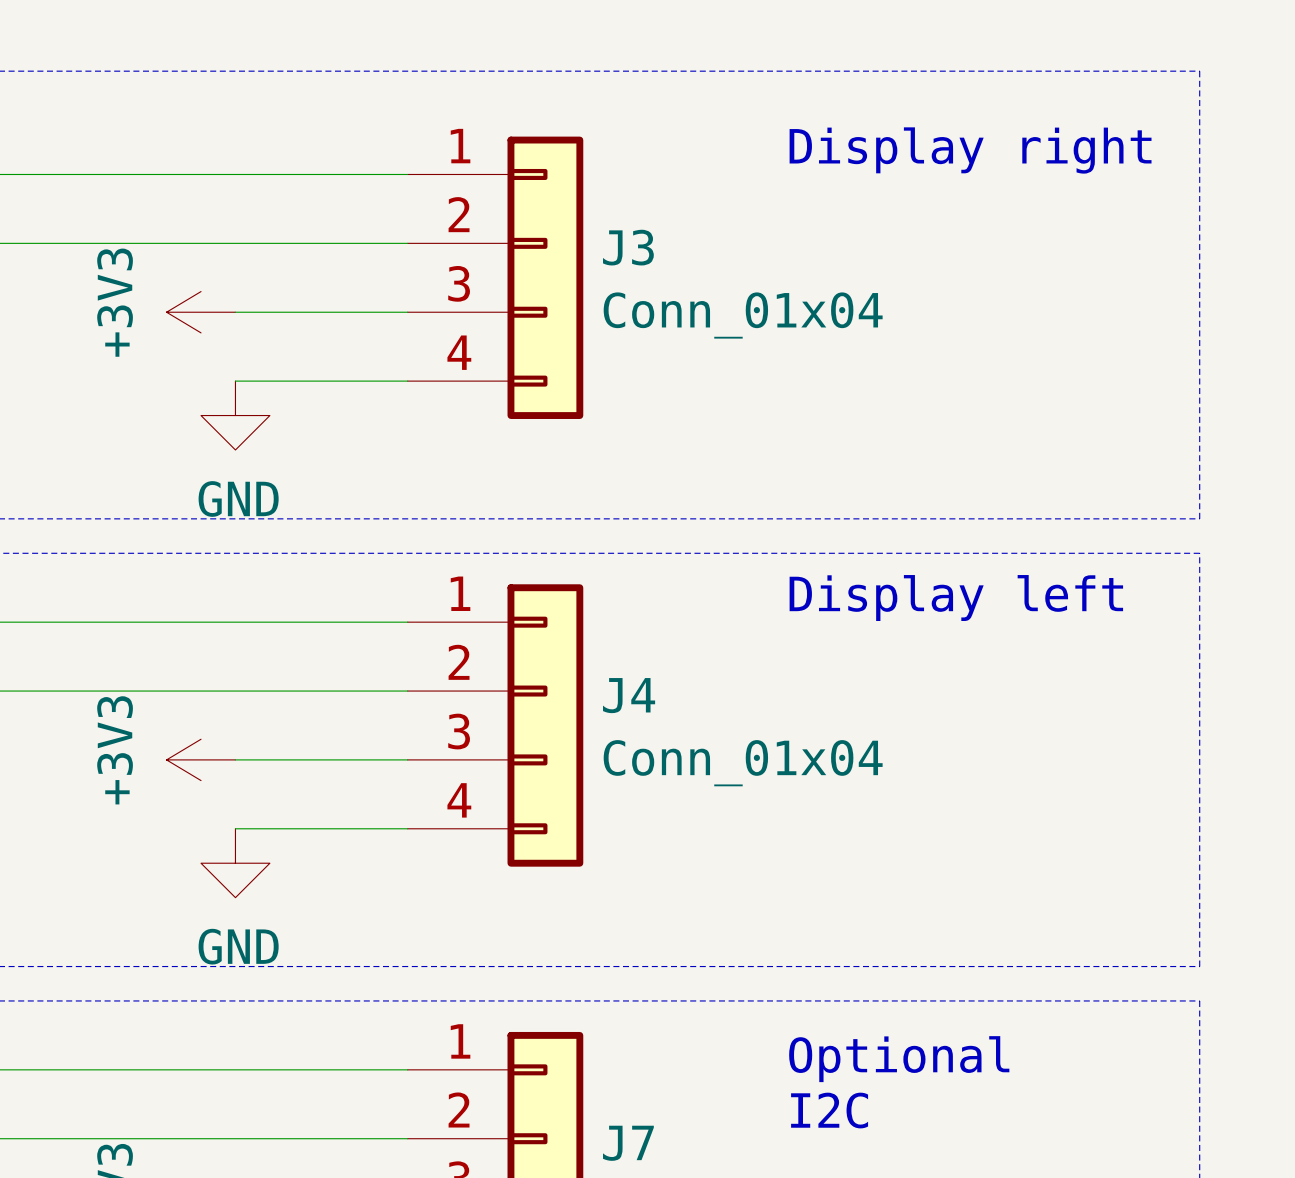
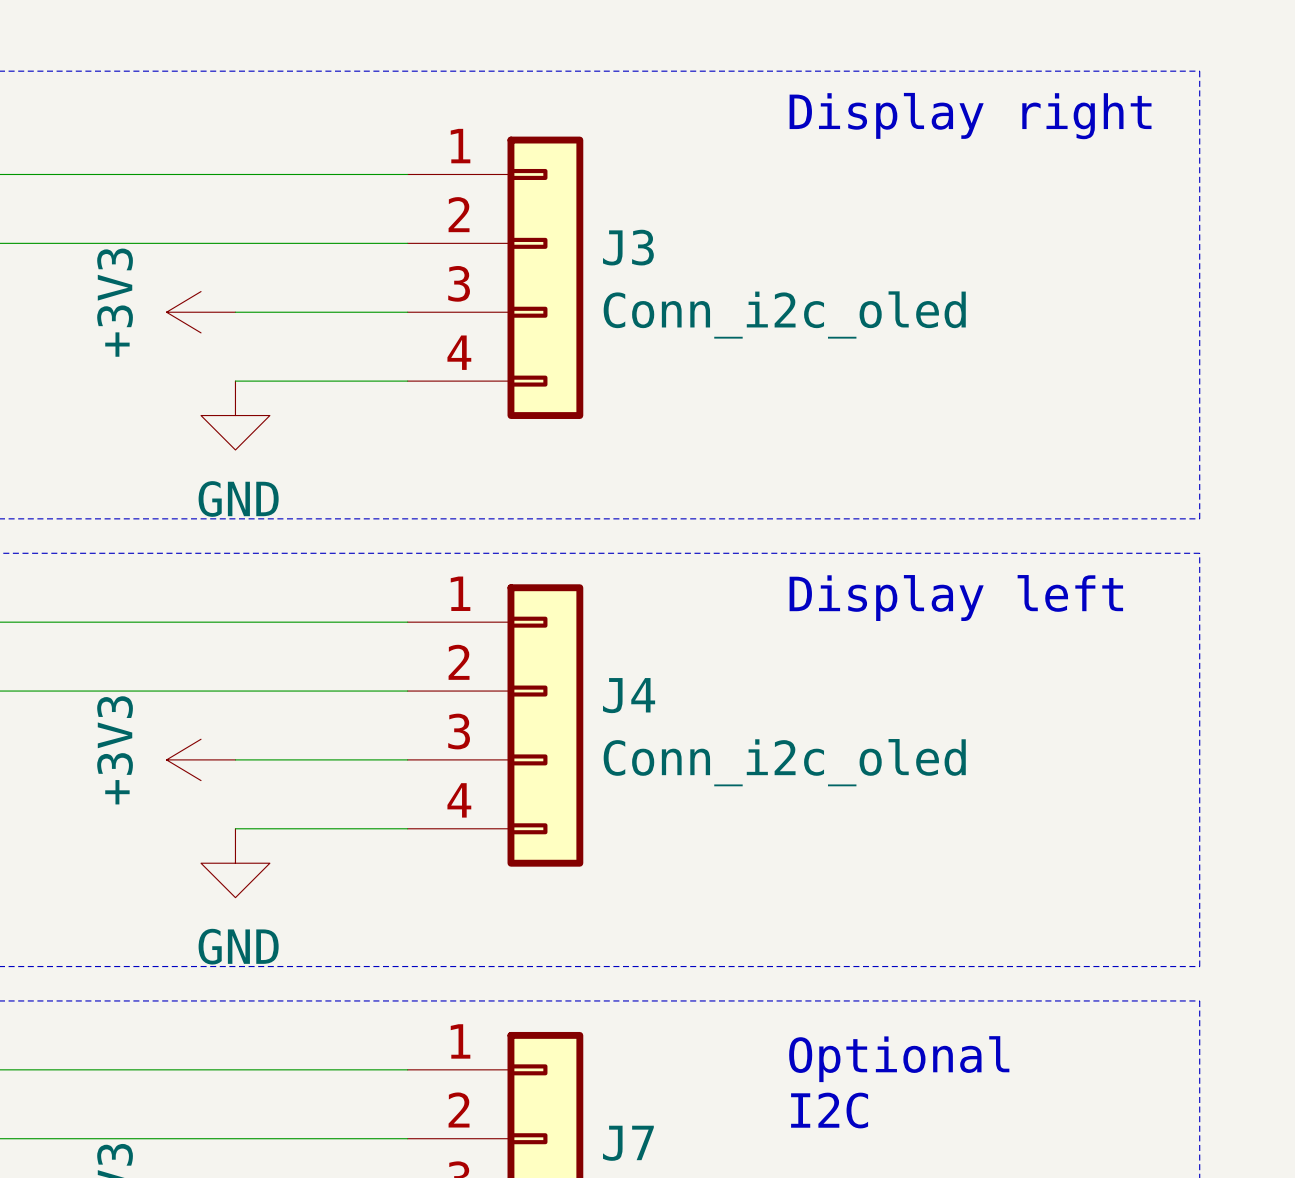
text position: Display right (970, 150) -> Display right (970, 116)
J3 value: Conn_01x04 (743, 315) -> Conn_i2c_oled (784, 314)
J4 value: Conn_01x04 (743, 763) -> Conn_i2c_oled (784, 762)

